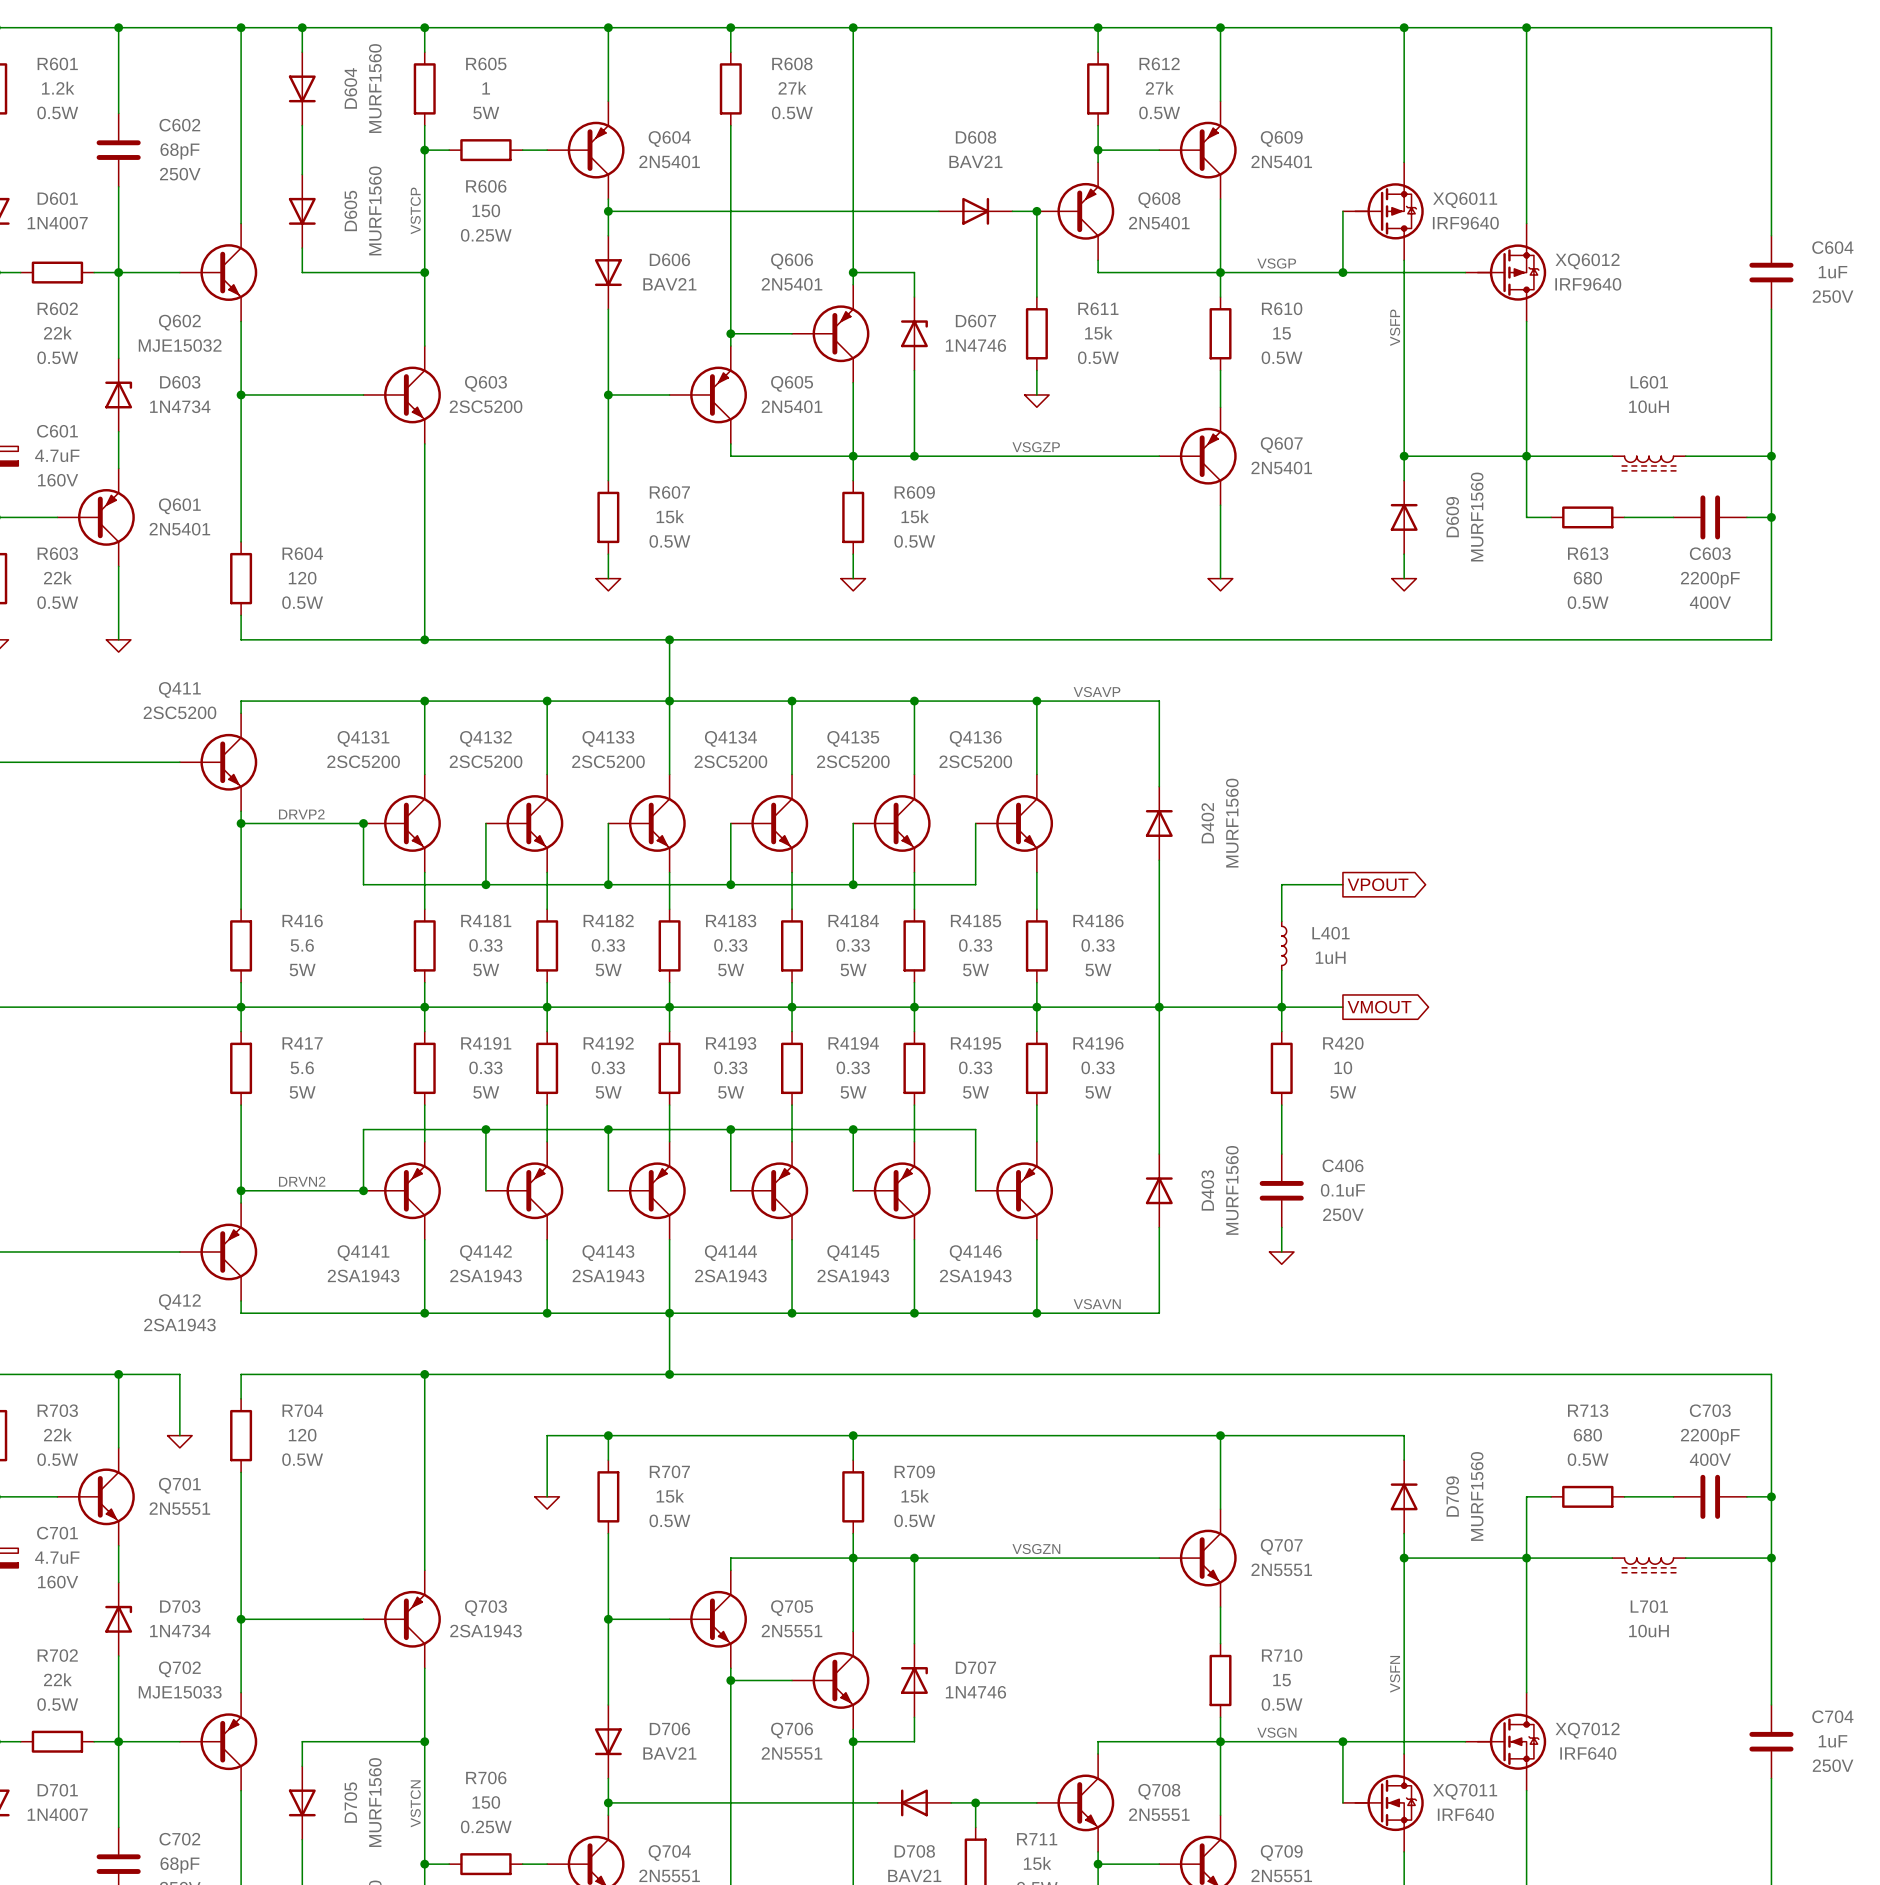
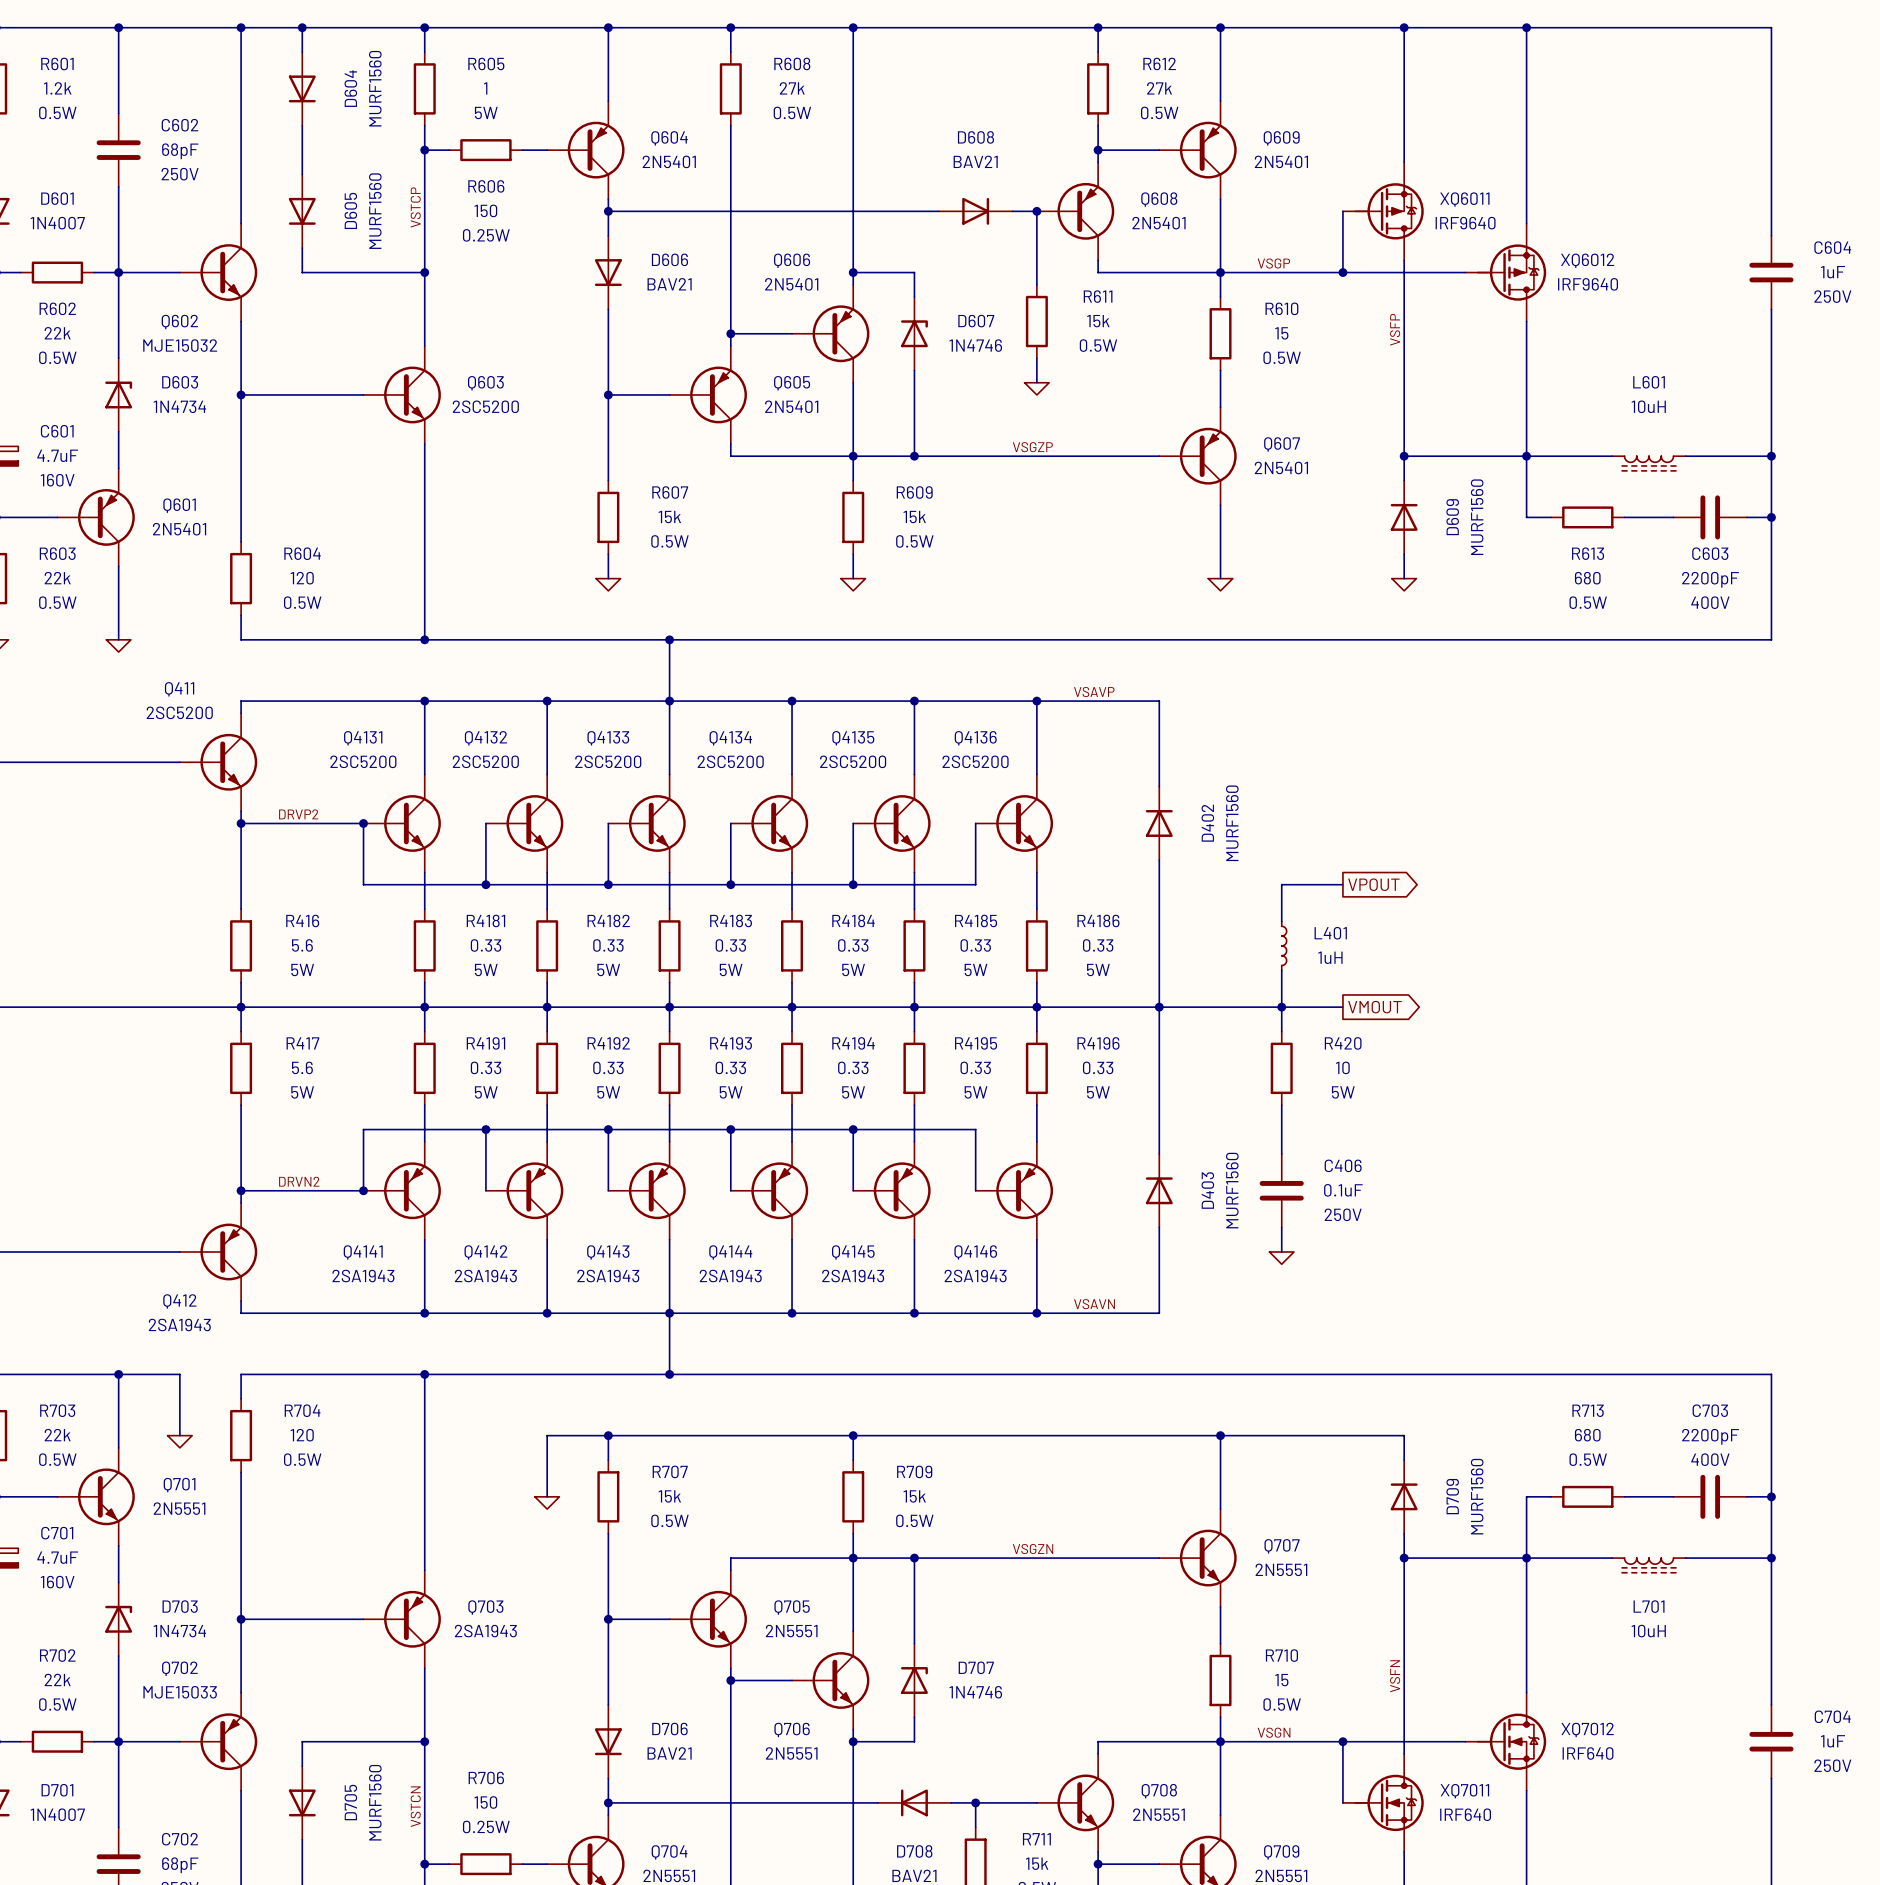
R611 position: (1036, 333) -> (1036, 321)
power symbol position: (1036, 401) -> (1036, 388)

